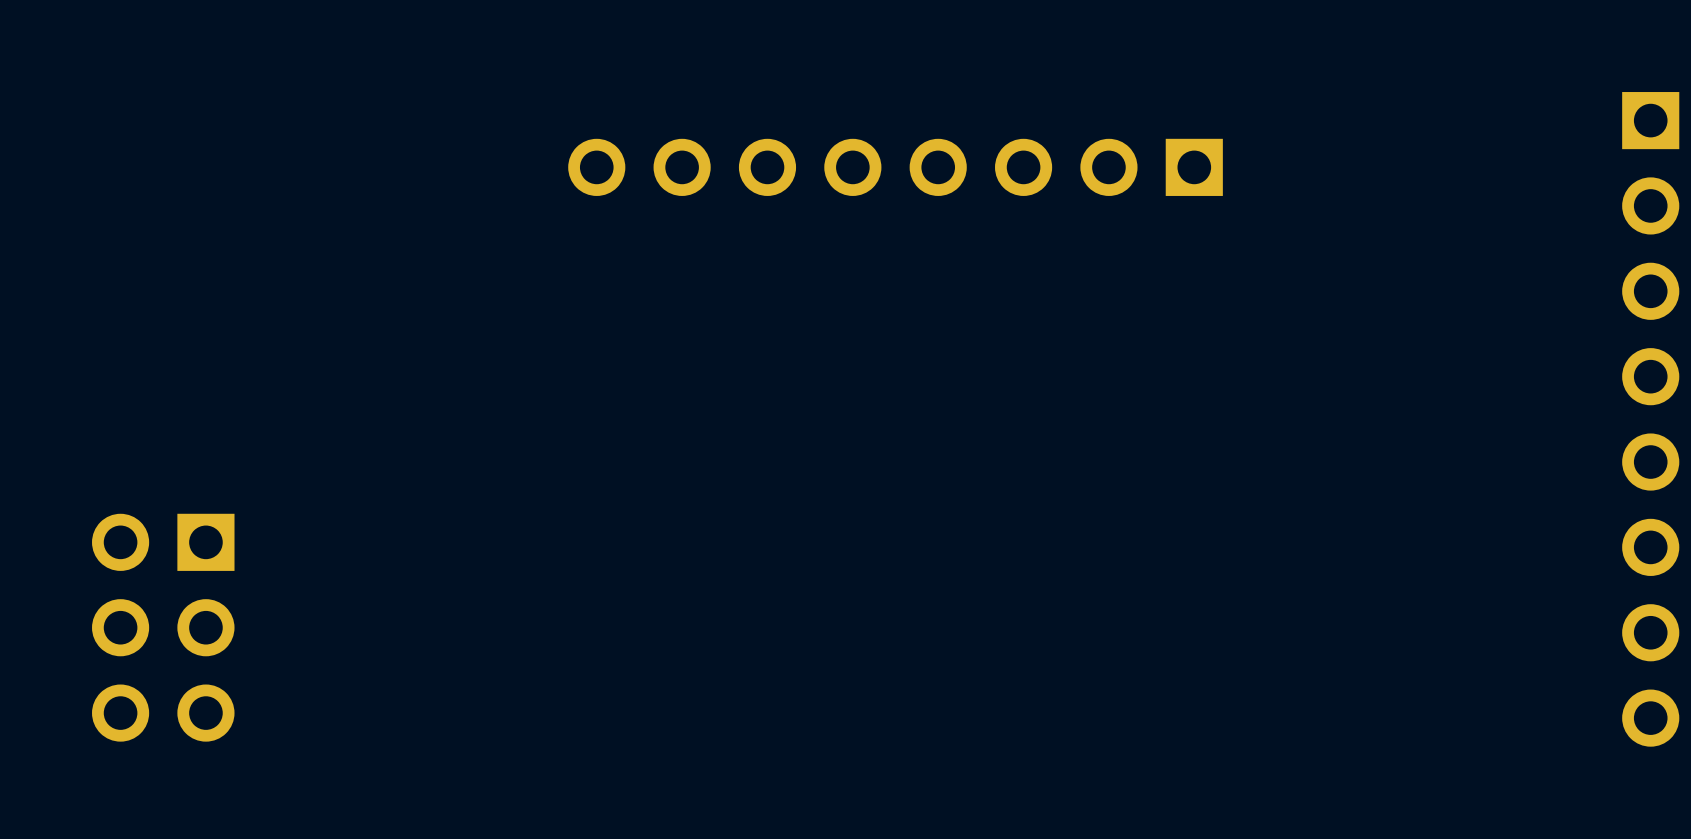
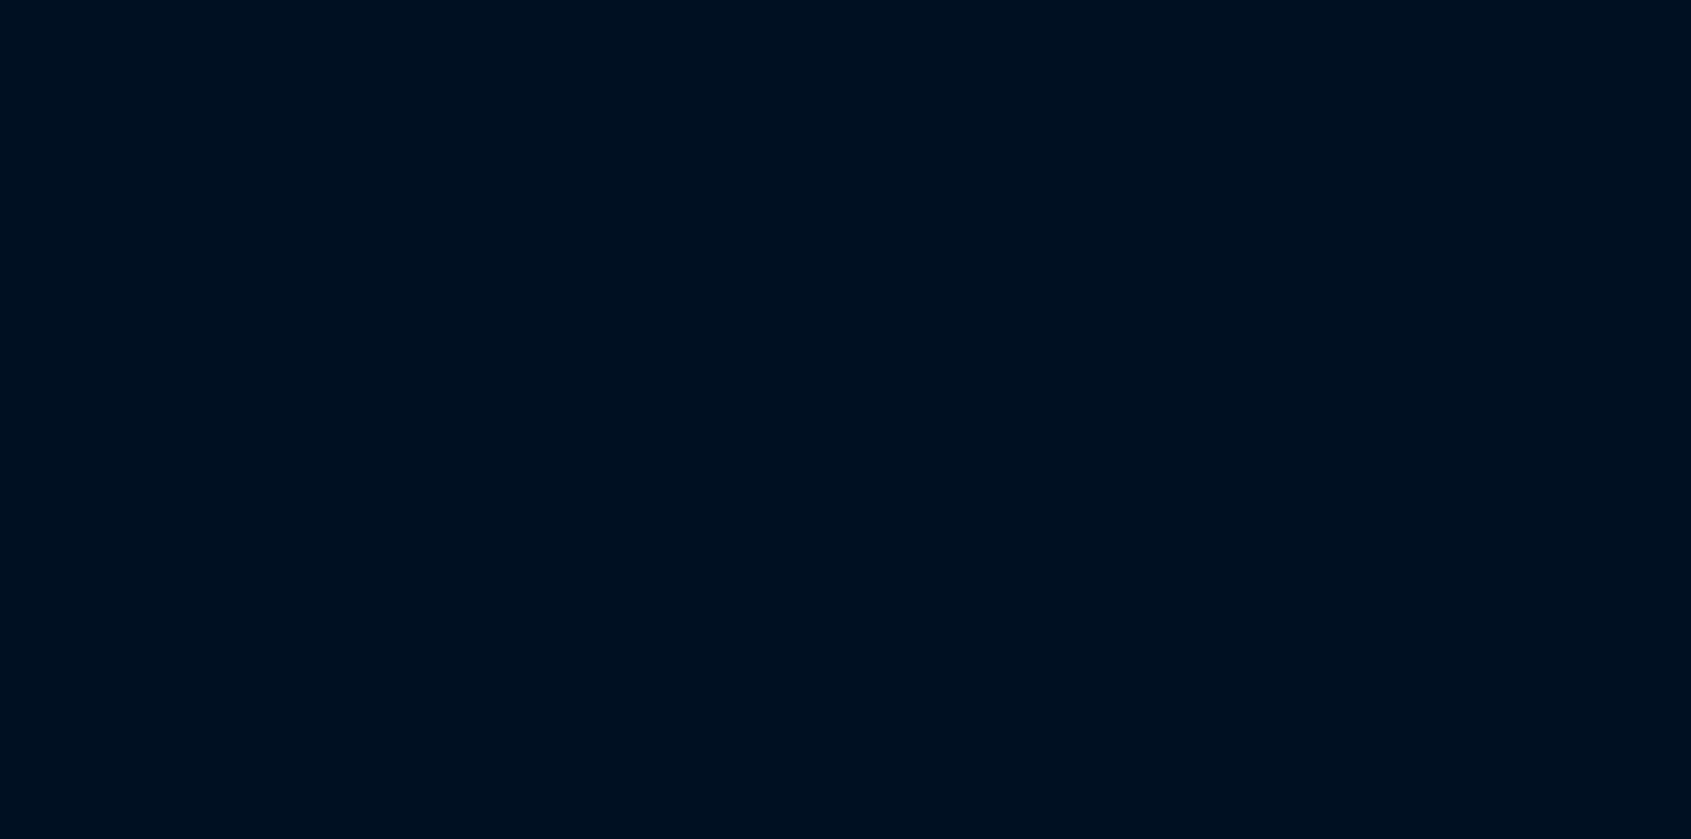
part: (895, 167) -> none
part: (1650, 419) -> none
part: (163, 627) -> none

